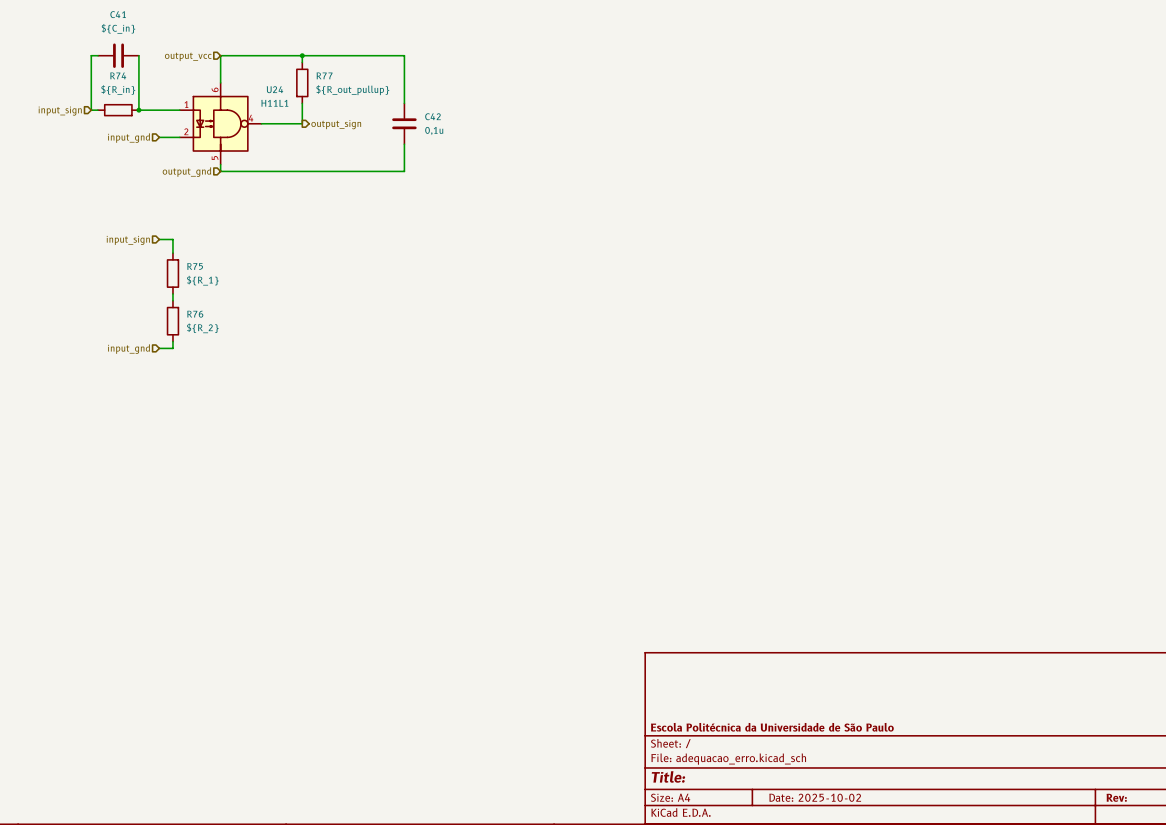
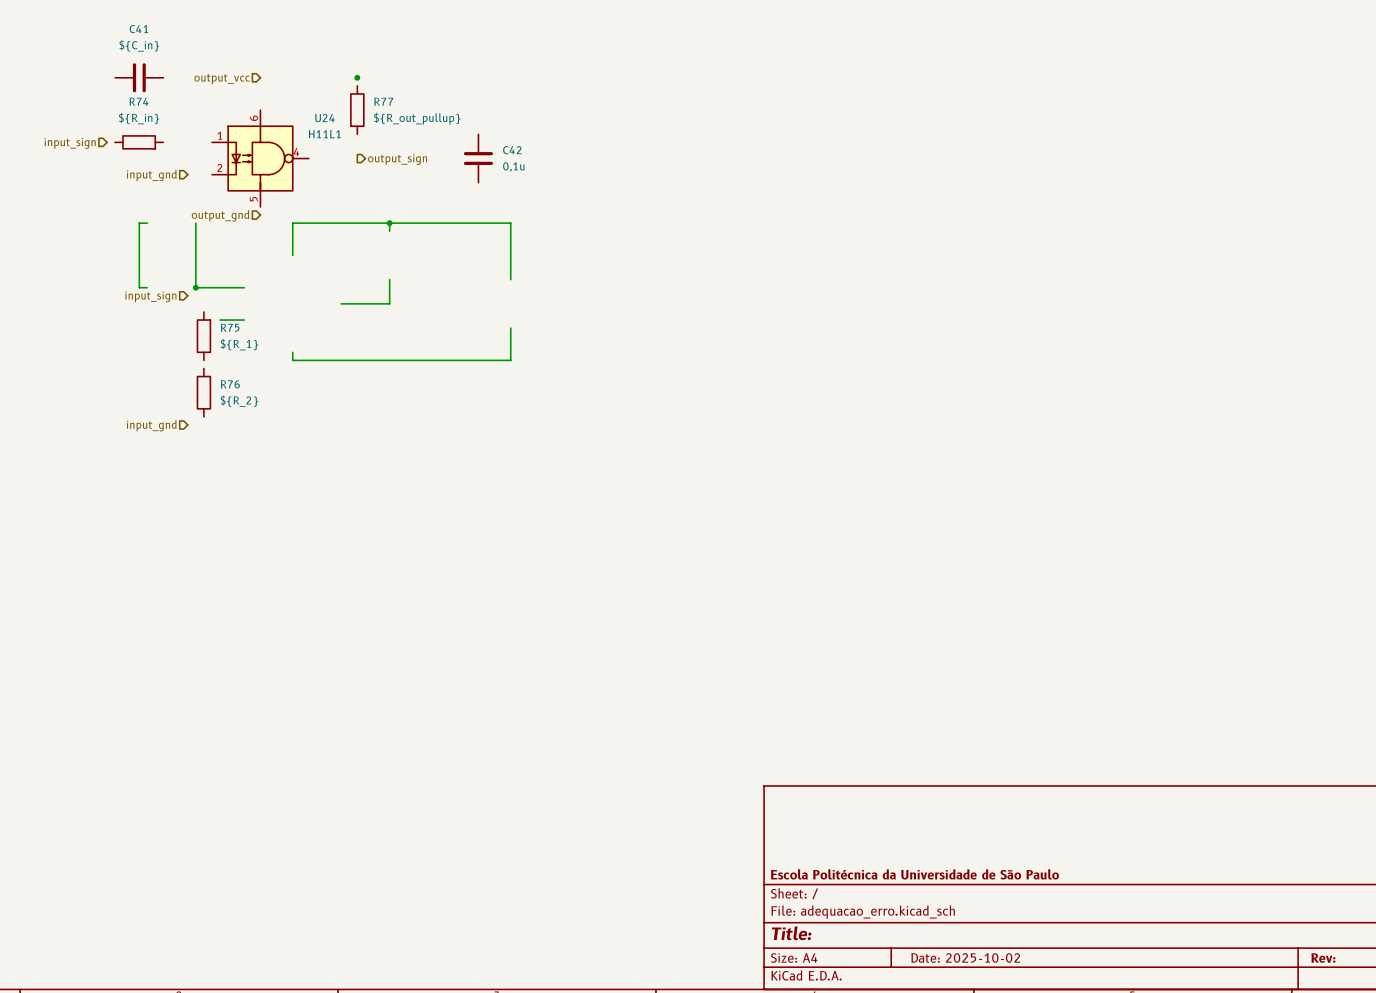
wire: (98, 55) (91, 55) (91, 110) (97, 110) -> (147, 223) (139, 223) (139, 287) (147, 287)
wire: (138, 55) (138, 110) -> (195, 223) (195, 287)
wire: (302, 55) (302, 62) -> (389, 223) (389, 231)
wire: (220, 82) (220, 55) (404, 55) (404, 103) -> (292, 255) (292, 223) (510, 223) (510, 279)
wire: (302, 103) (302, 123) (261, 123) -> (389, 279) (389, 303) (341, 303)
wire: (138, 110) (179, 110) -> (195, 287) (244, 287)
junction: (138, 110) -> none
wire: (159, 137) (179, 137) -> (220, 320) (244, 320)
wire: (404, 144) (404, 171) (220, 171) (220, 164) -> (510, 328) (510, 360) (292, 360) (292, 352)
junction: none -> (389, 223)
junction: none -> (195, 287)
wire: (159, 239) (172, 239) (172, 253) -> none
wire: (172, 293) (172, 300) -> none
wire: (172, 341) (172, 348) (159, 348) -> none

